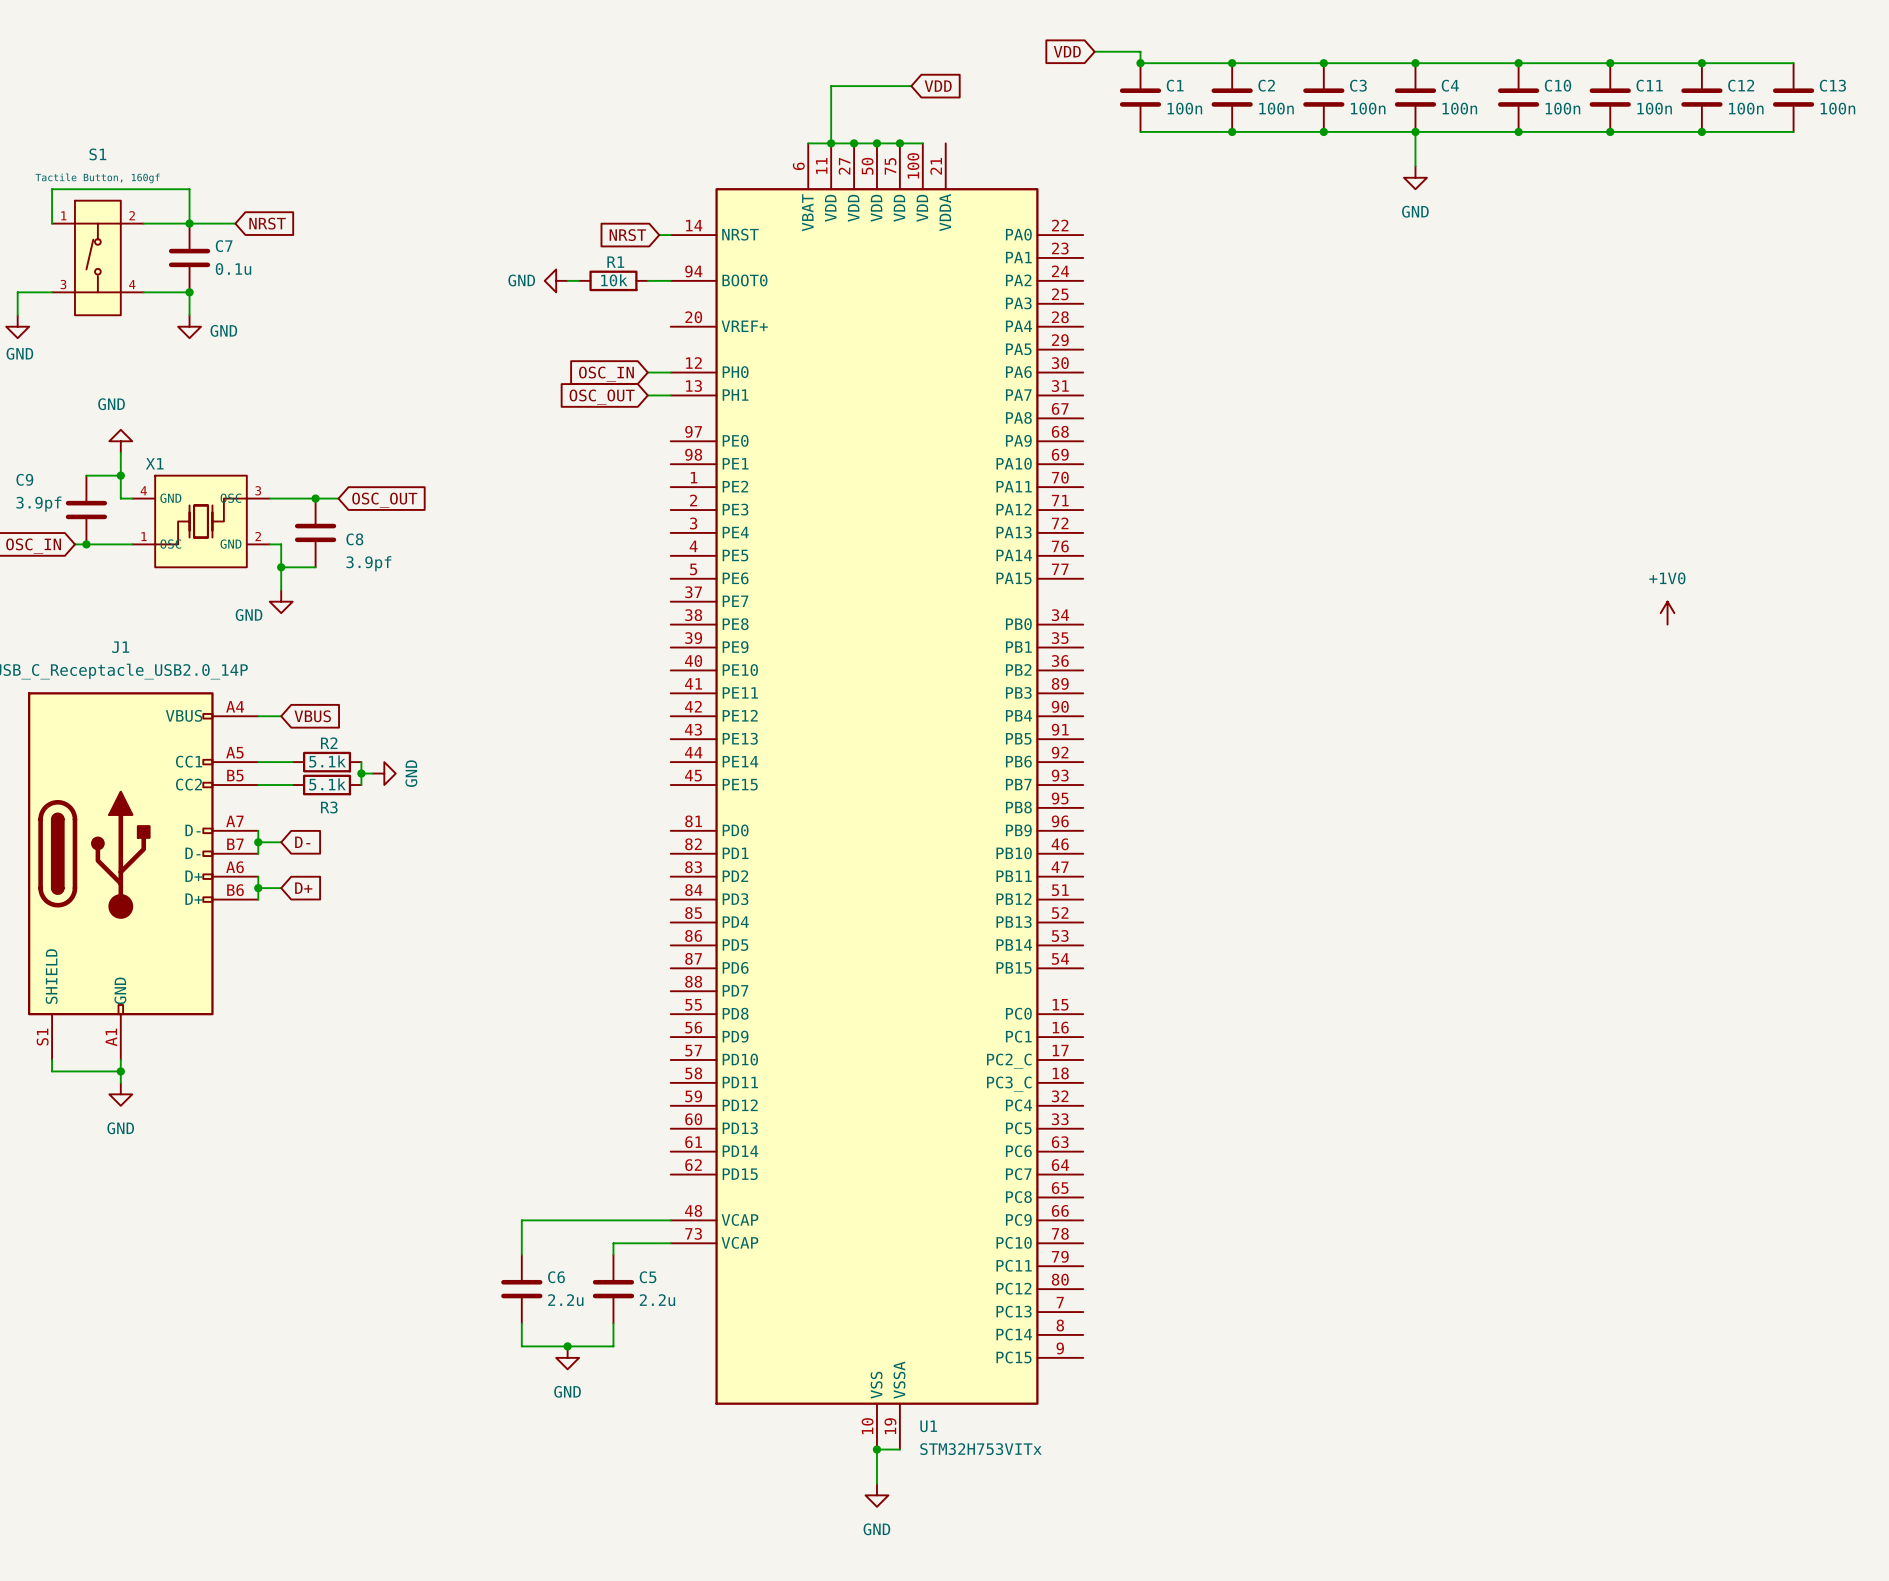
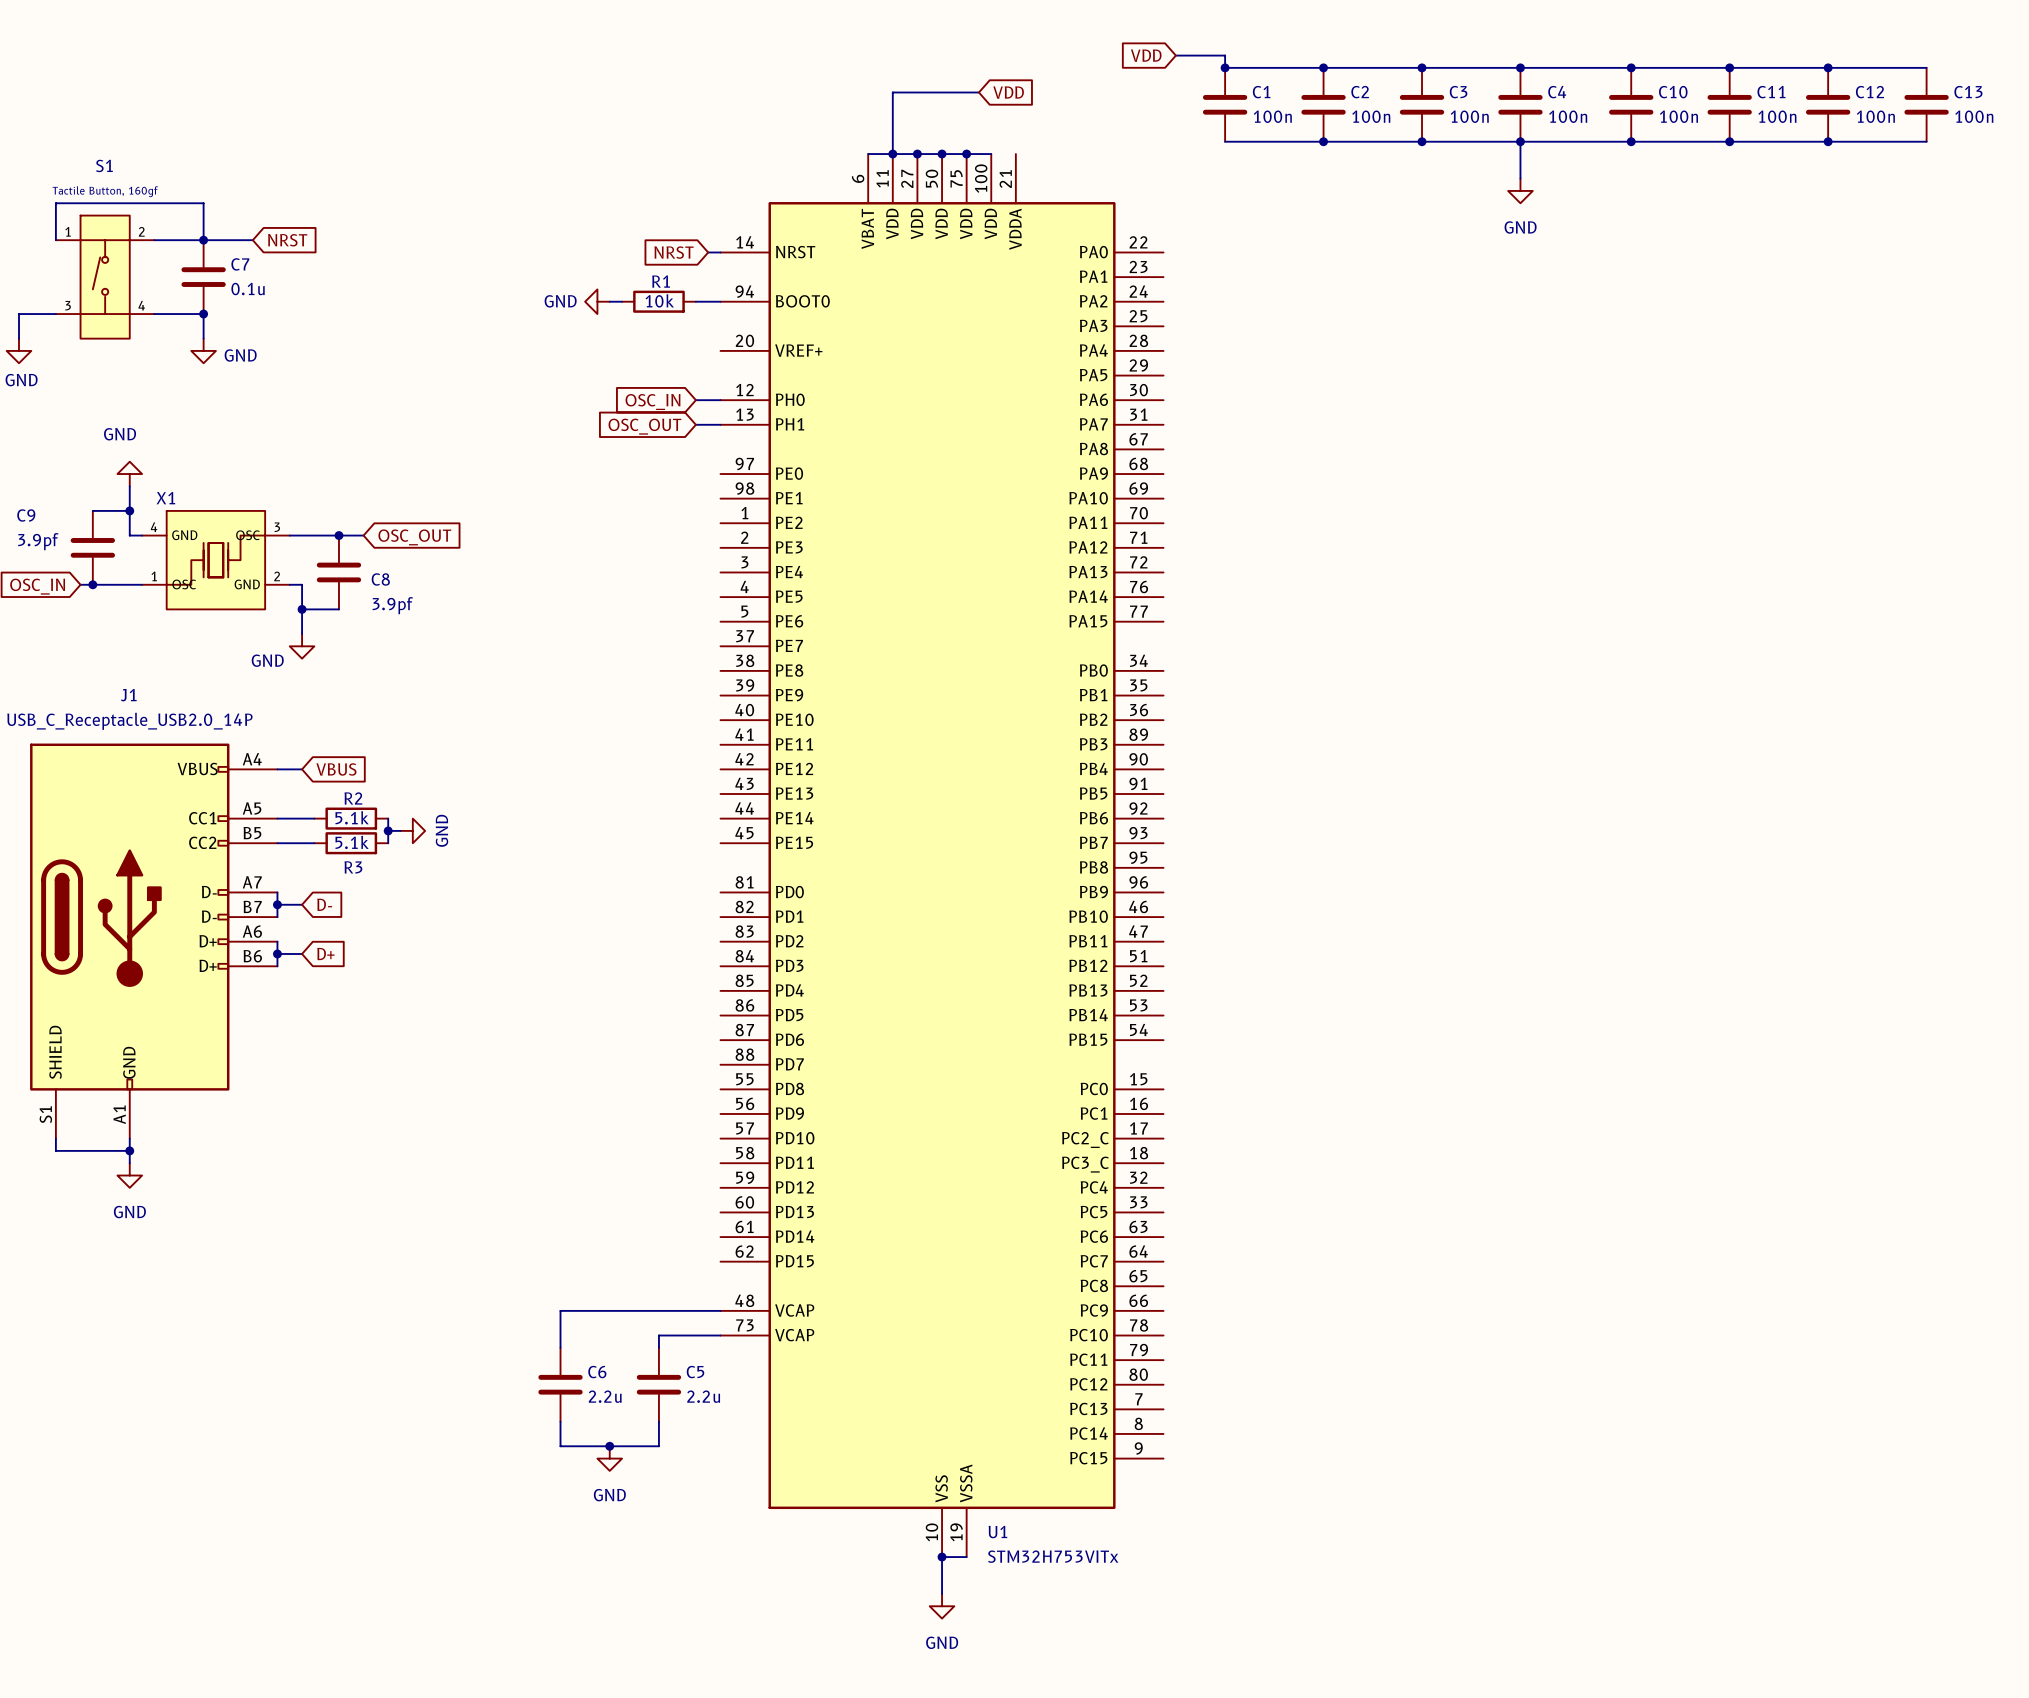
power symbol: +1V0 (1667, 613) -> none

